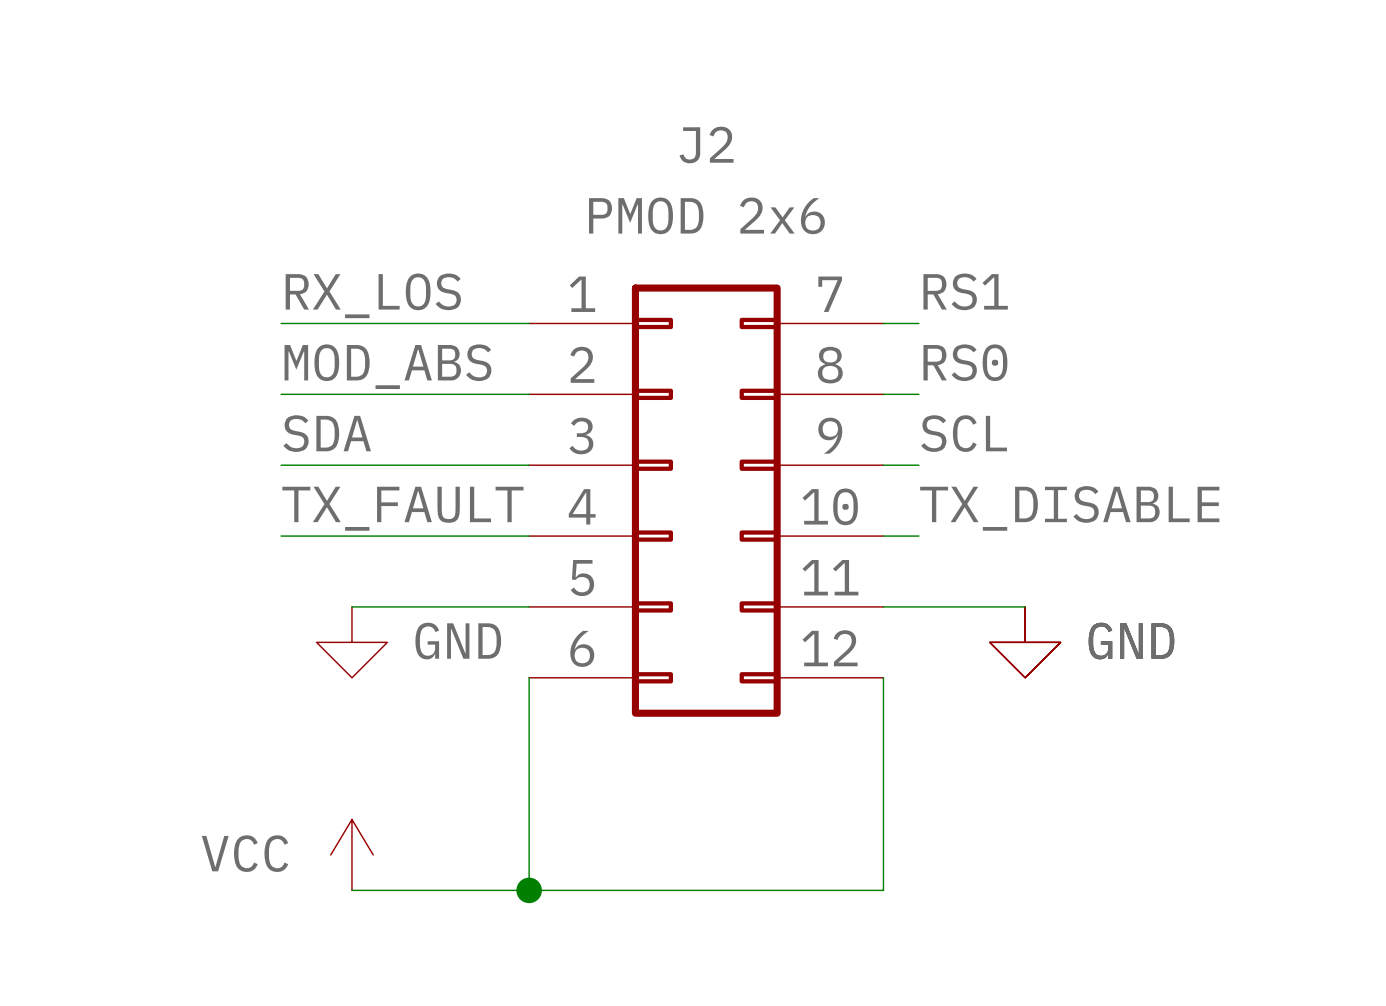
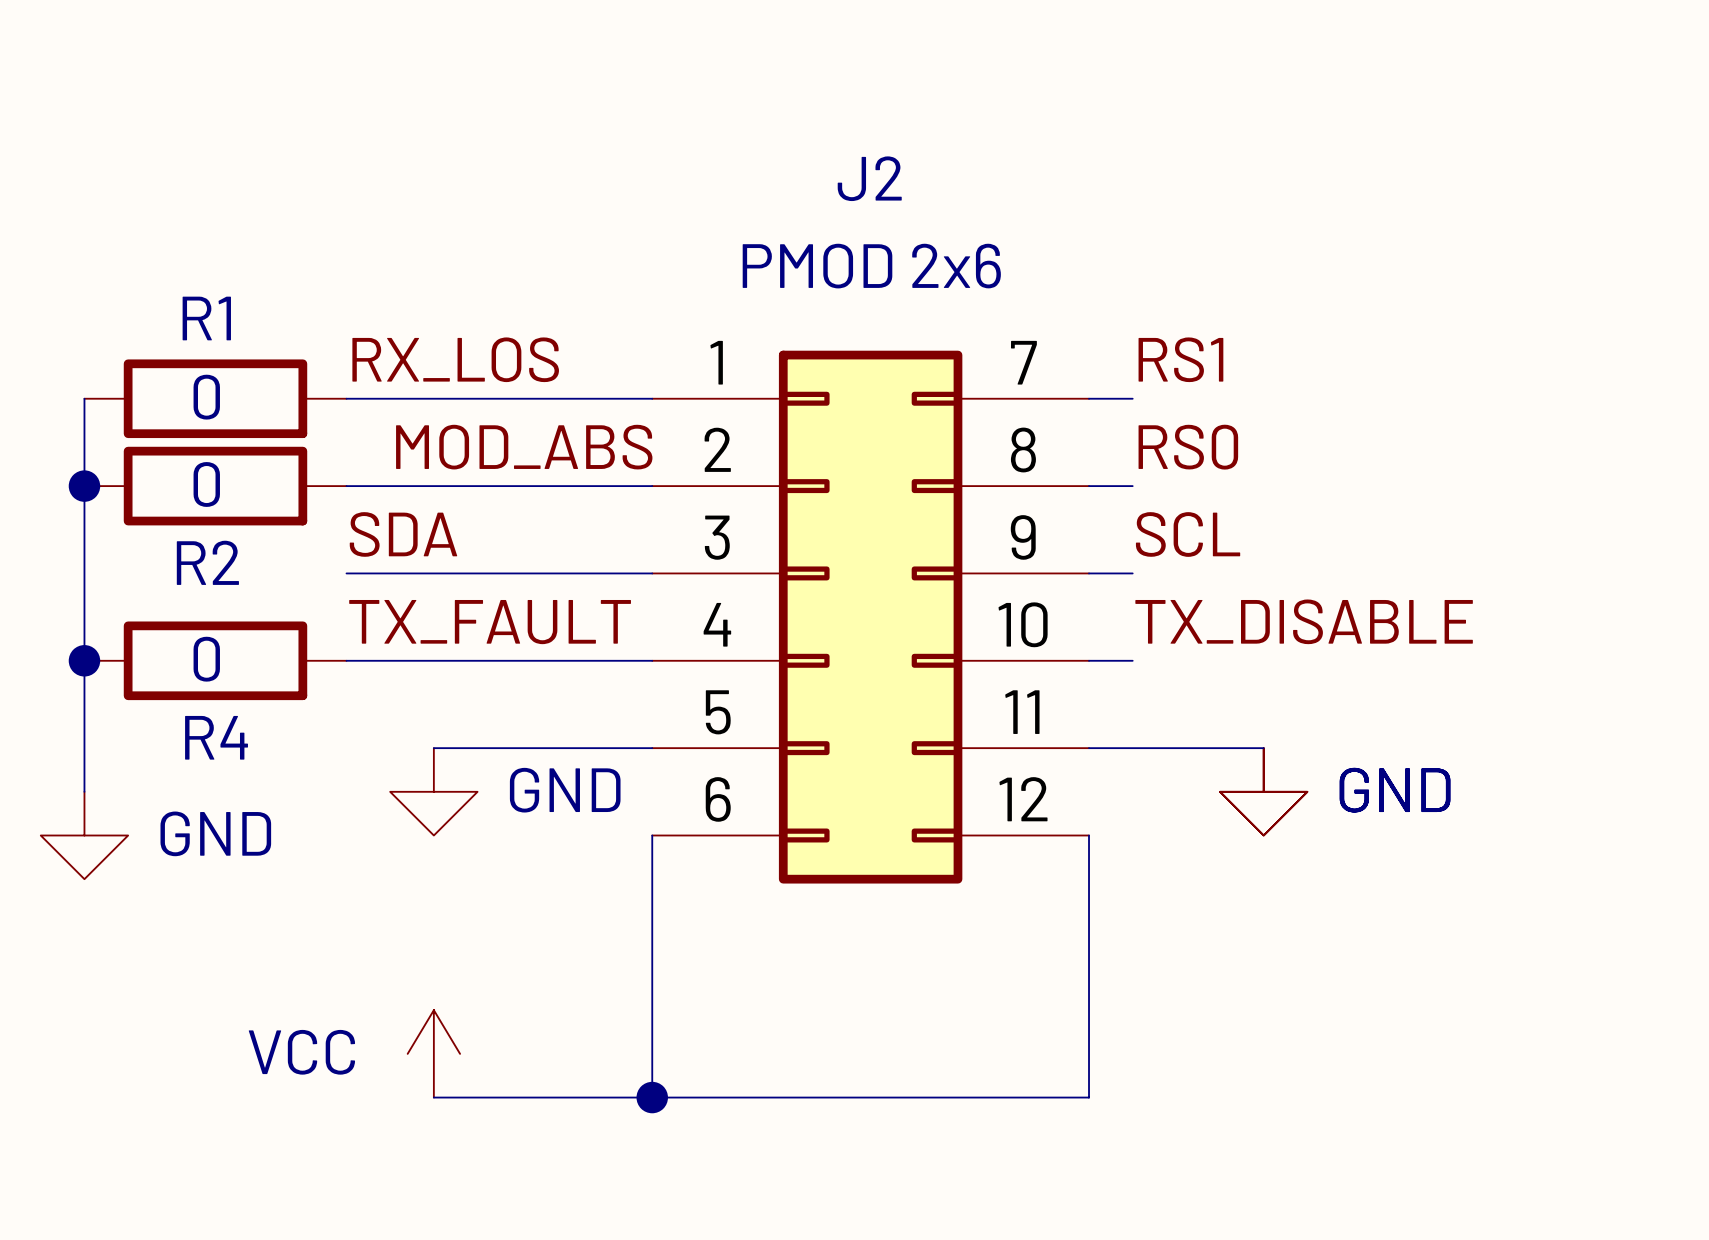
wire: none -> (84, 398) (84, 791)
R1: none -> 0 (215, 398)
label position: MOD_ABS (387, 366) -> MOD_ABS (524, 447)
junction: none -> (84, 486)
R2: none -> 0 (215, 486)
junction: none -> (84, 660)
R4: none -> 0 (215, 660)
power symbol: none -> GND (84, 835)

